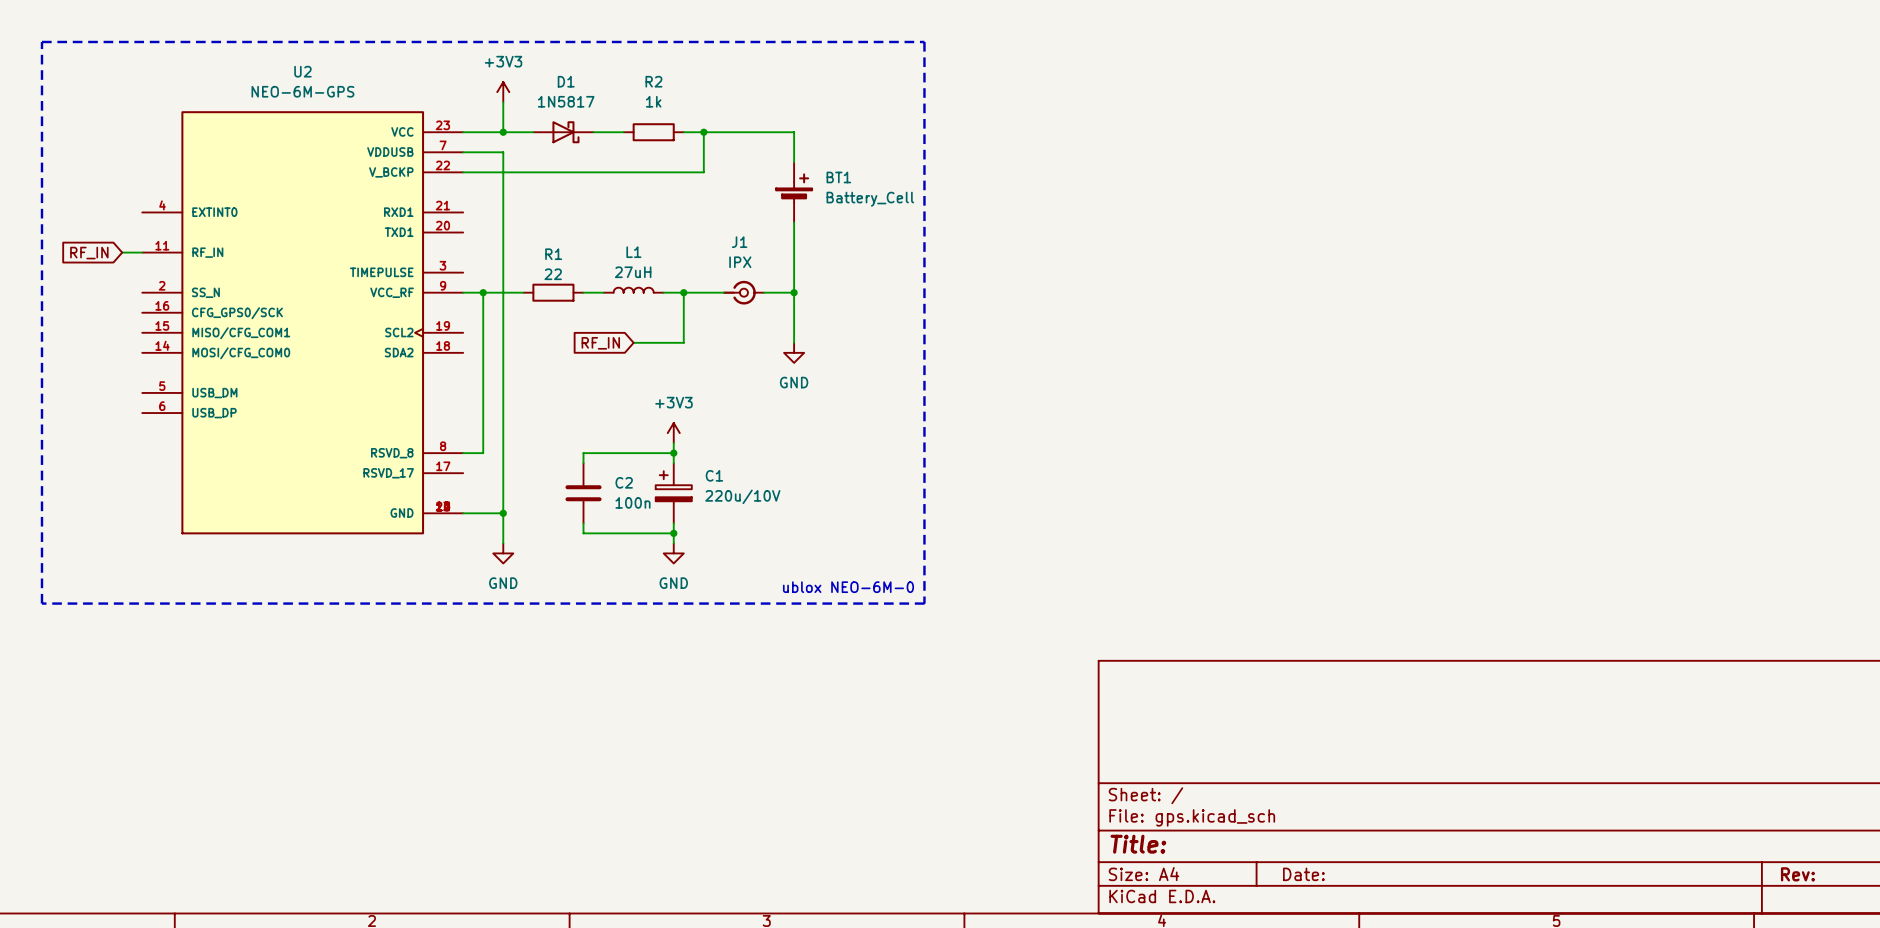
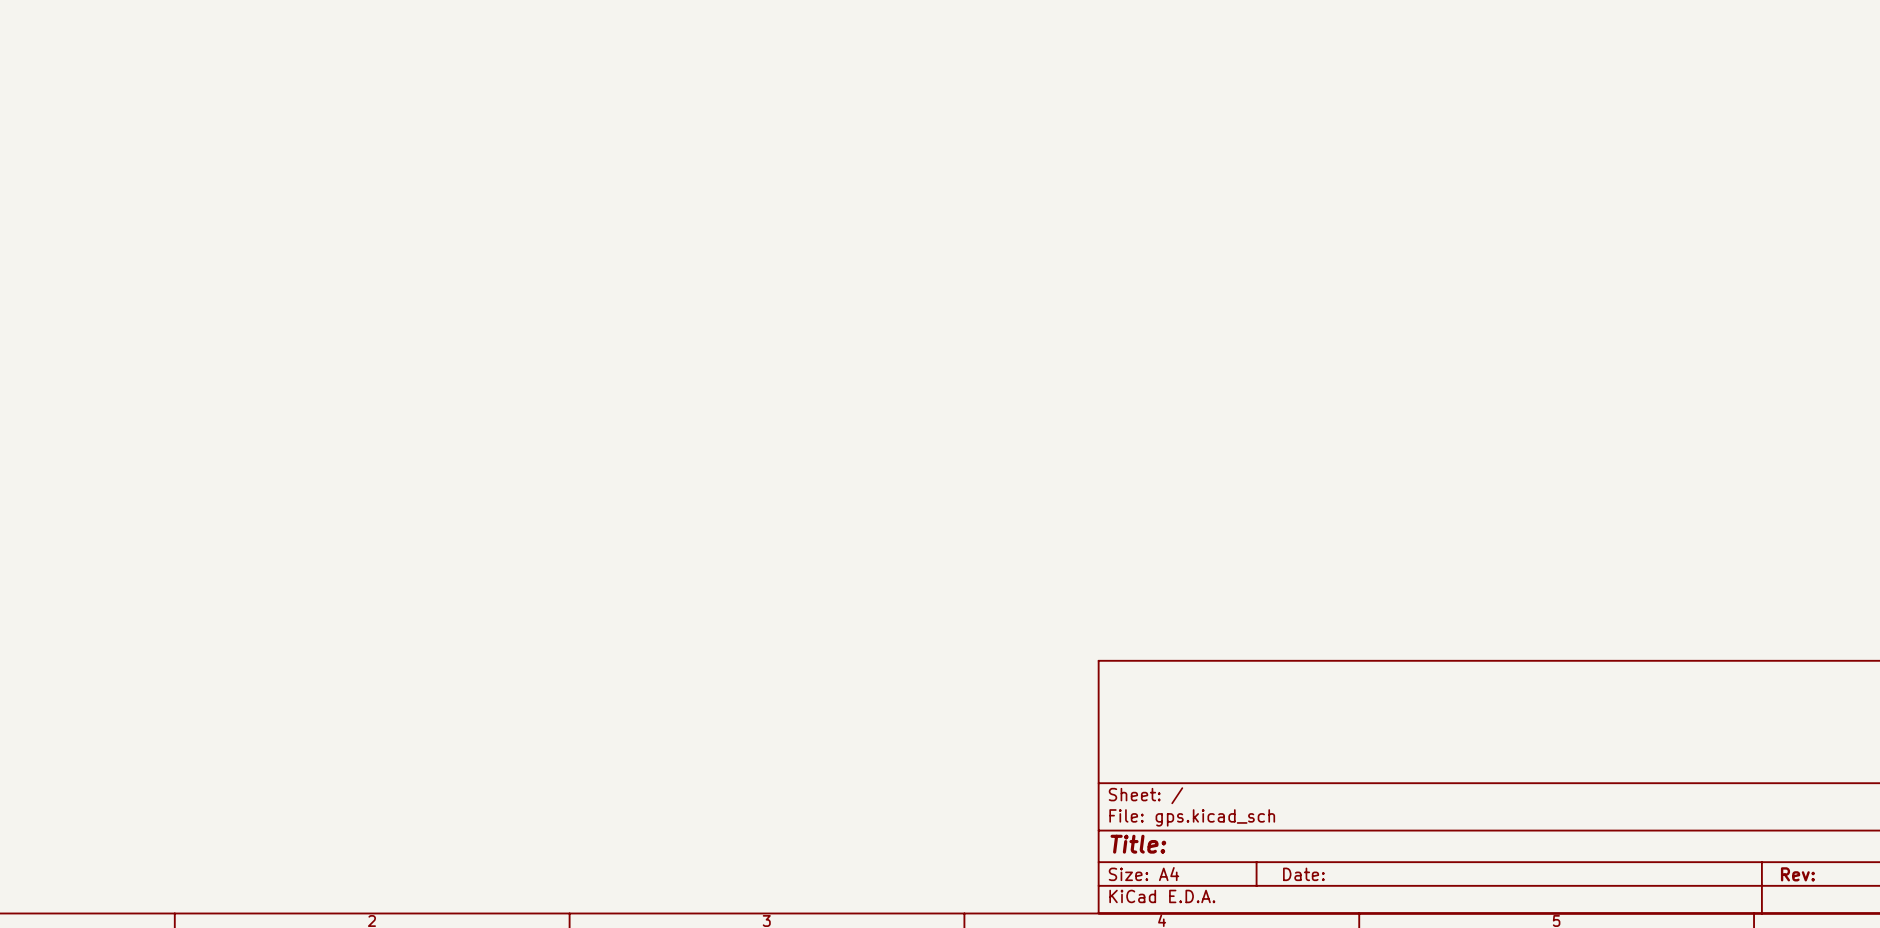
line: (41, 41) (924, 41) (924, 603) (41, 603) (41, 41) -> none
power symbol: +3V3 (503, 92) -> none
wire: (503, 102) (503, 132) -> none
wire: (463, 132) (533, 132) -> none
junction: (503, 132) -> none
D1: 1N5817 (563, 132) -> none
wire: (593, 132) (623, 132) -> none
R2: 1k (653, 132) -> none
wire: (683, 132) (794, 132) (794, 162) -> none
wire: (703, 132) (703, 172) (463, 172) -> none
junction: (703, 132) -> none
wire: (463, 152) (503, 152) (503, 543) -> none
BT1: Battery_Cell (794, 192) -> none
wire: (794, 222) (794, 342) -> none
wire: (122, 252) (142, 252) -> none
global label: RF_IN (89, 253) -> none
L1: 27uH (633, 290) -> none
wire: (463, 292) (523, 292) -> none
wire: (483, 292) (483, 453) (463, 453) -> none
junction: (483, 292) -> none
R1: 22 (553, 292) -> none
wire: (583, 292) (603, 292) -> none
wire: (663, 292) (723, 292) -> none
wire: (683, 292) (683, 342) (633, 342) -> none
junction: (683, 292) -> none
J1: IPX (743, 292) -> none
wire: (764, 292) (794, 292) -> none
junction: (794, 292) -> none
U2: NEO-6M-GPS (302, 322) -> none
global label: RF_IN (600, 343) -> none
power symbol: GND (794, 352) -> none
power symbol: +3V3 (673, 433) -> none
wire: (673, 443) (673, 463) -> none
wire: (673, 453) (583, 453) (583, 463) -> none
junction: (673, 453) -> none
C2: 100n (583, 493) -> none
C1: 220u/10V (673, 493) -> none
wire: (463, 513) (503, 513) -> none
junction: (503, 513) -> none
wire: (583, 523) (583, 533) (673, 533) -> none
wire: (673, 523) (673, 543) -> none
junction: (673, 533) -> none
power symbol: GND (503, 553) -> none
power symbol: GND (673, 553) -> none
text: ublox NEO-6M-0 (848, 587) -> none

